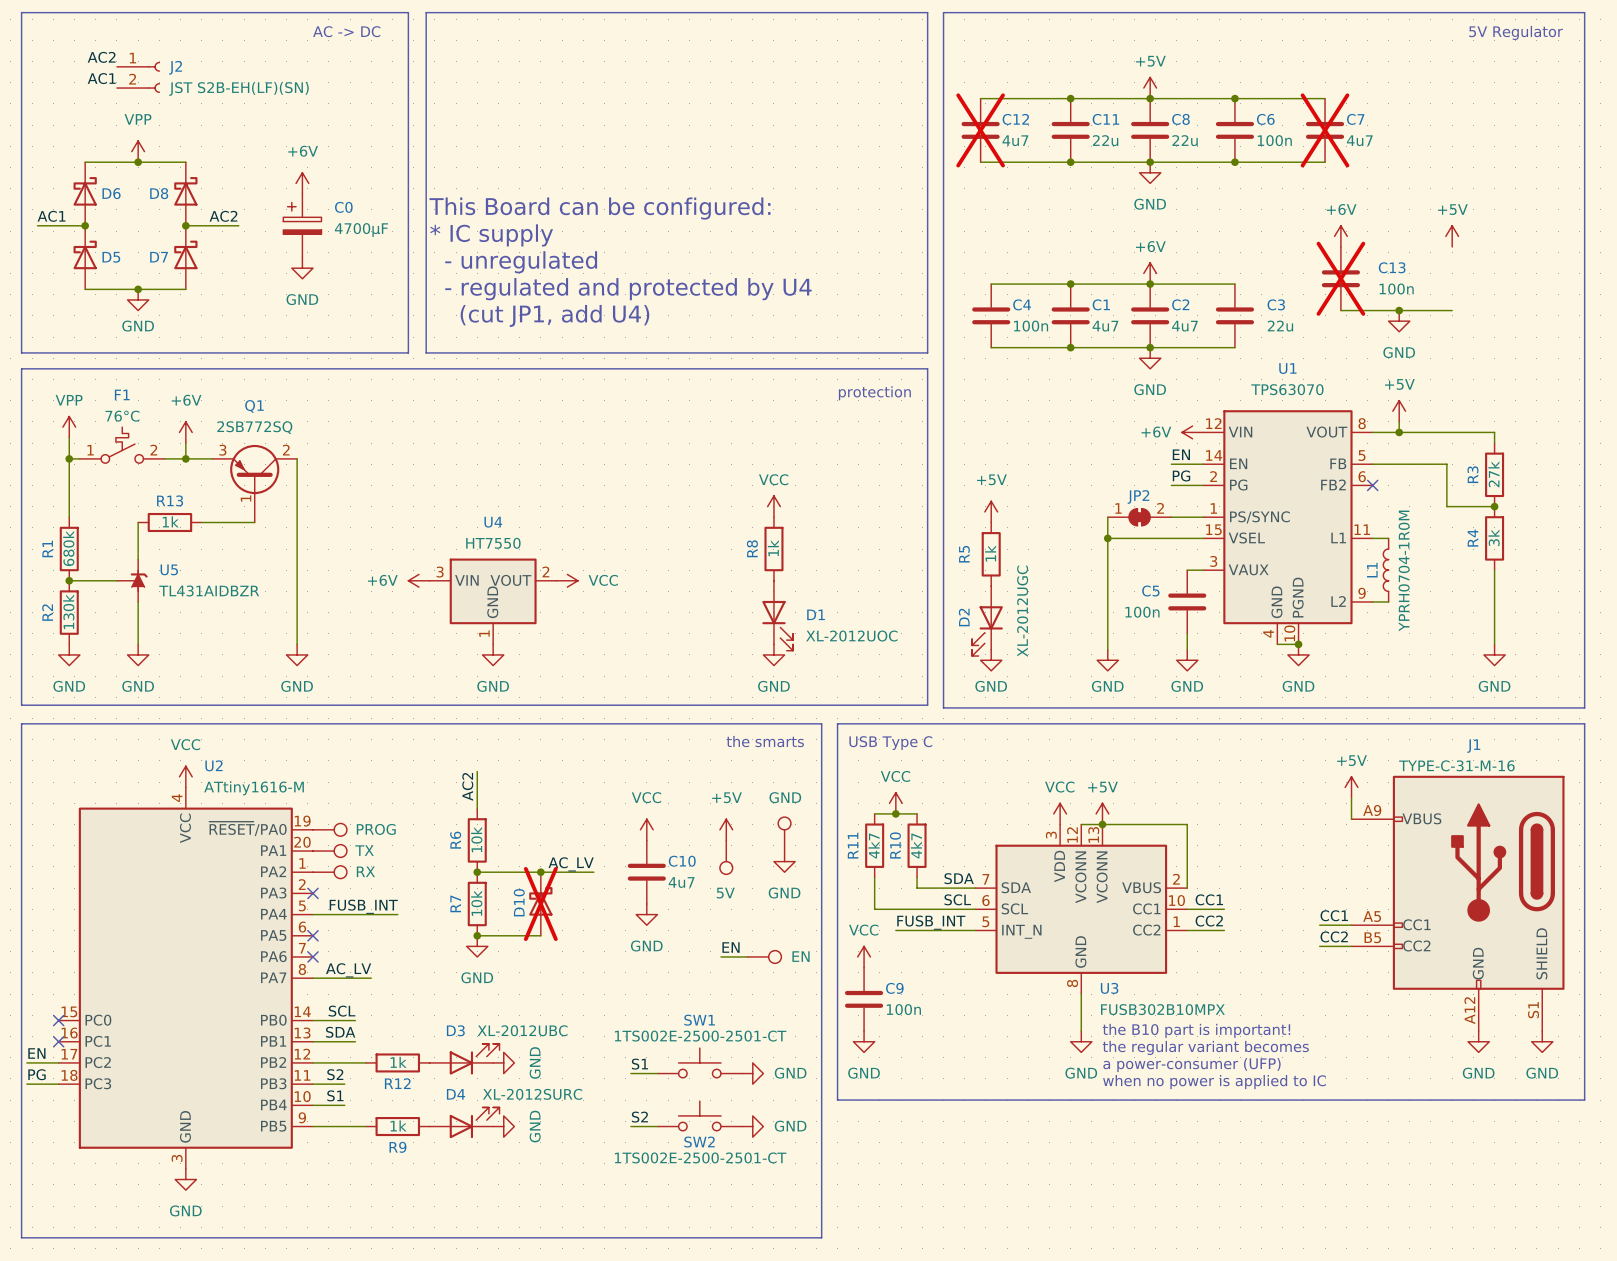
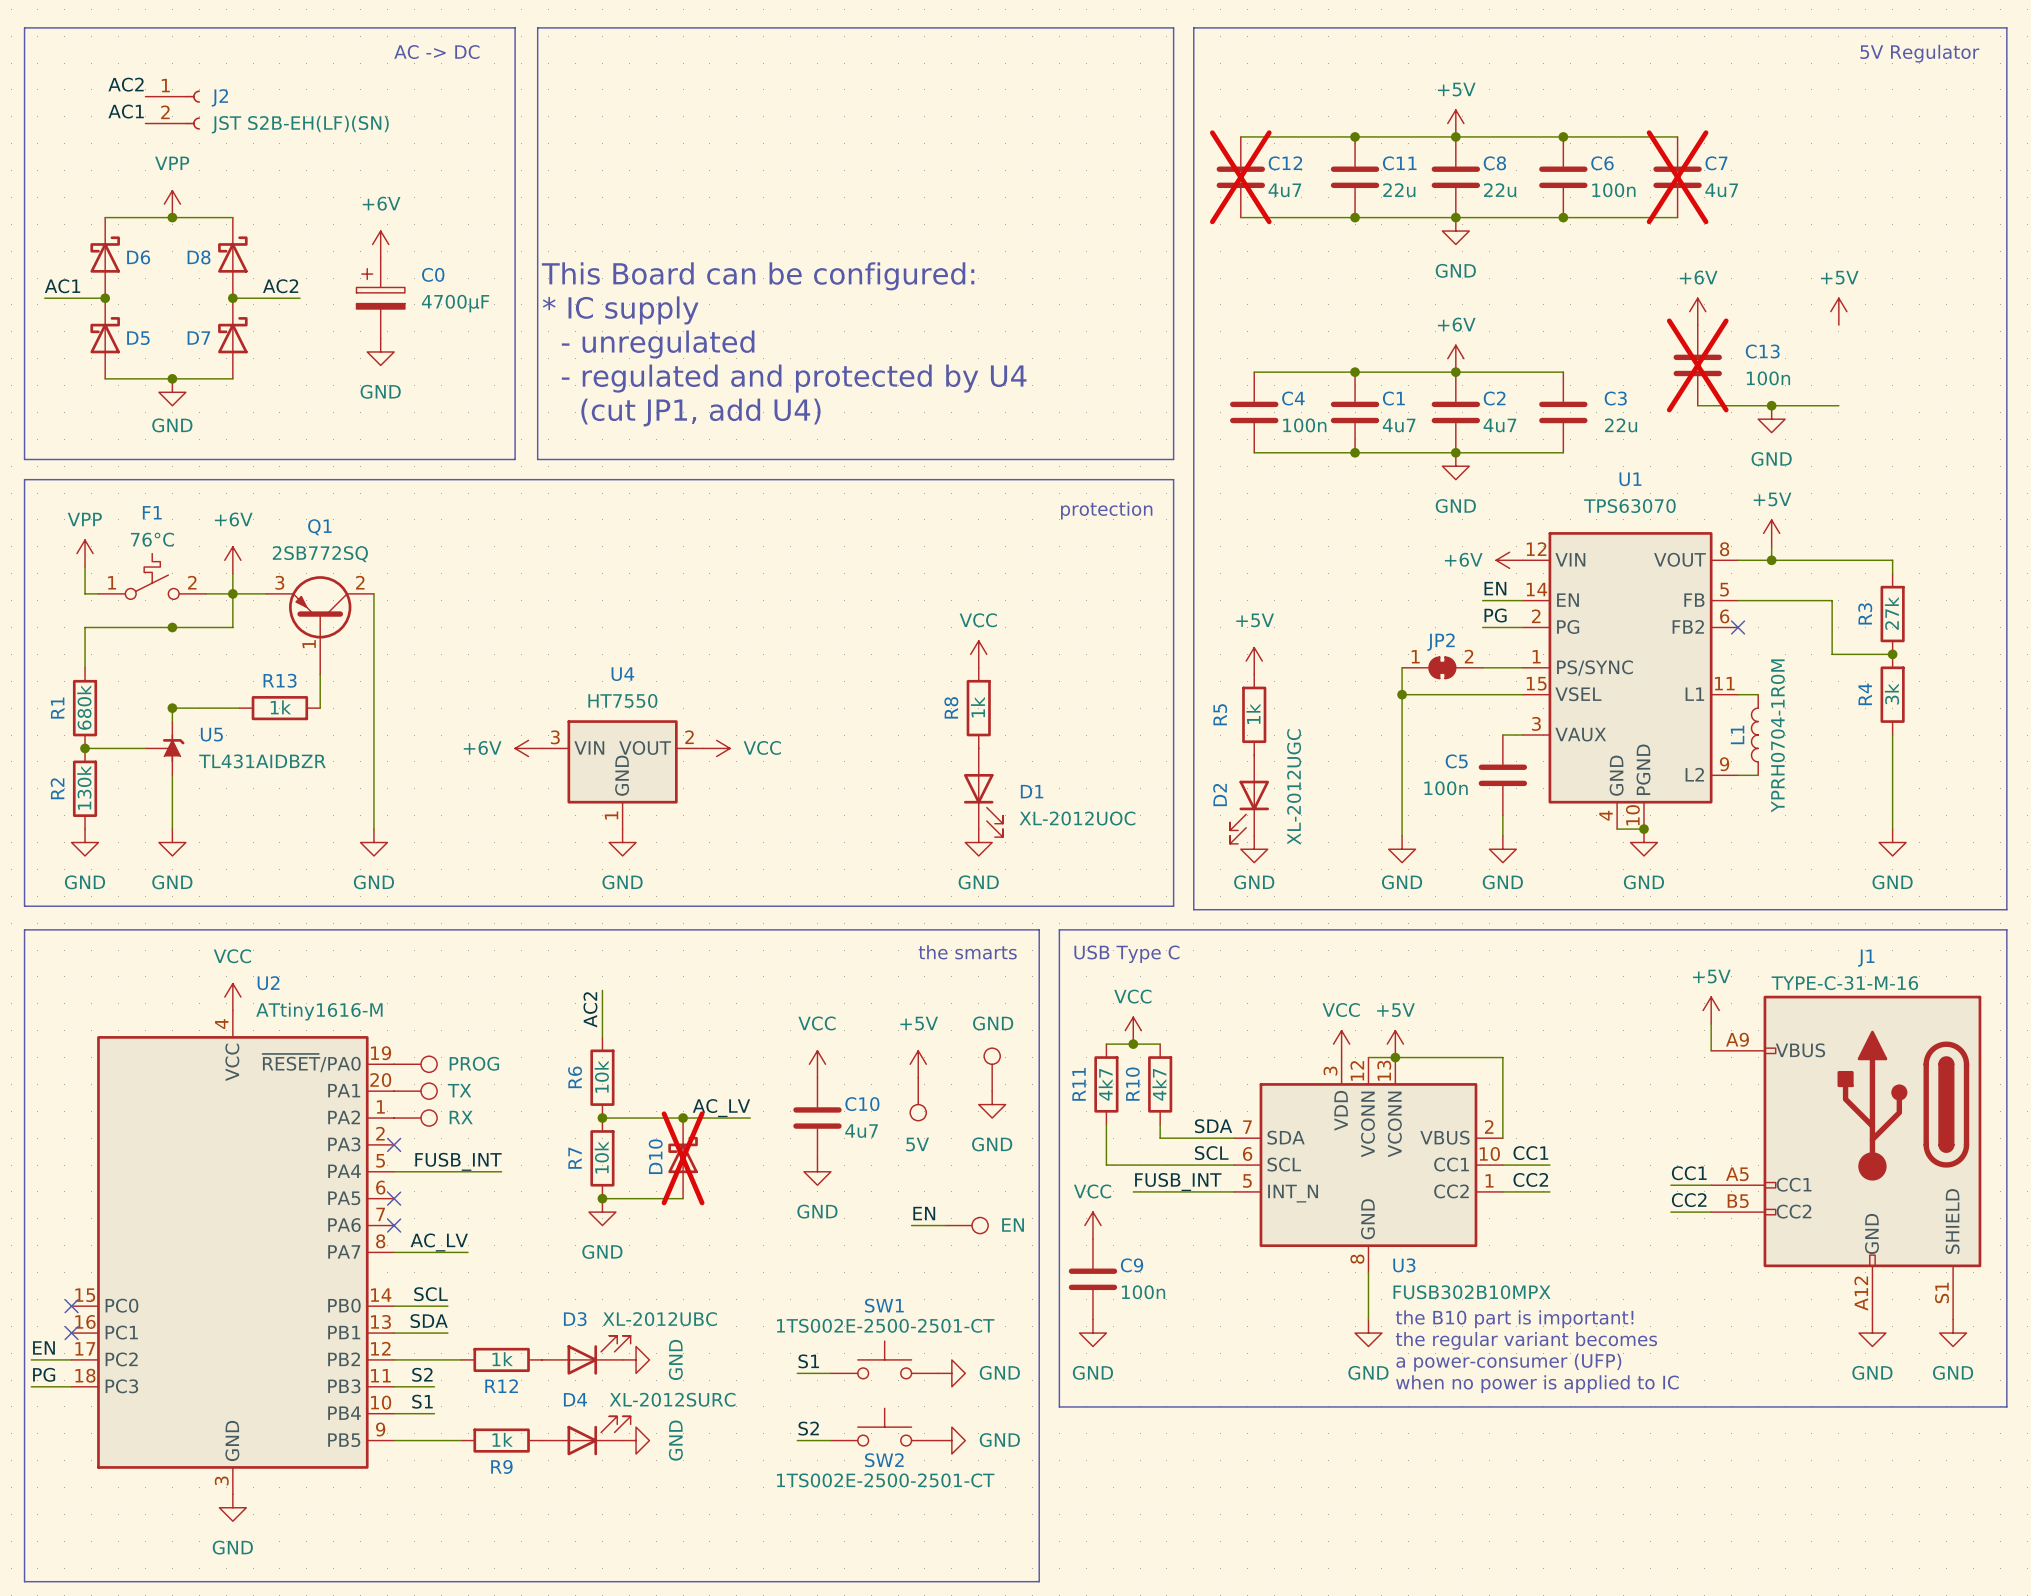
wire: (69, 458) (69, 485) -> (232, 593) (232, 627) (85, 627)
junction: (69, 458) -> none
junction: none -> (172, 627)
wire: (138, 522) (138, 549) -> (239, 708) (172, 708)
R13 position: (169, 522) -> (279, 708)
wire: (201, 522) (254, 522) -> (320, 708) (320, 674)
junction: none -> (172, 708)

